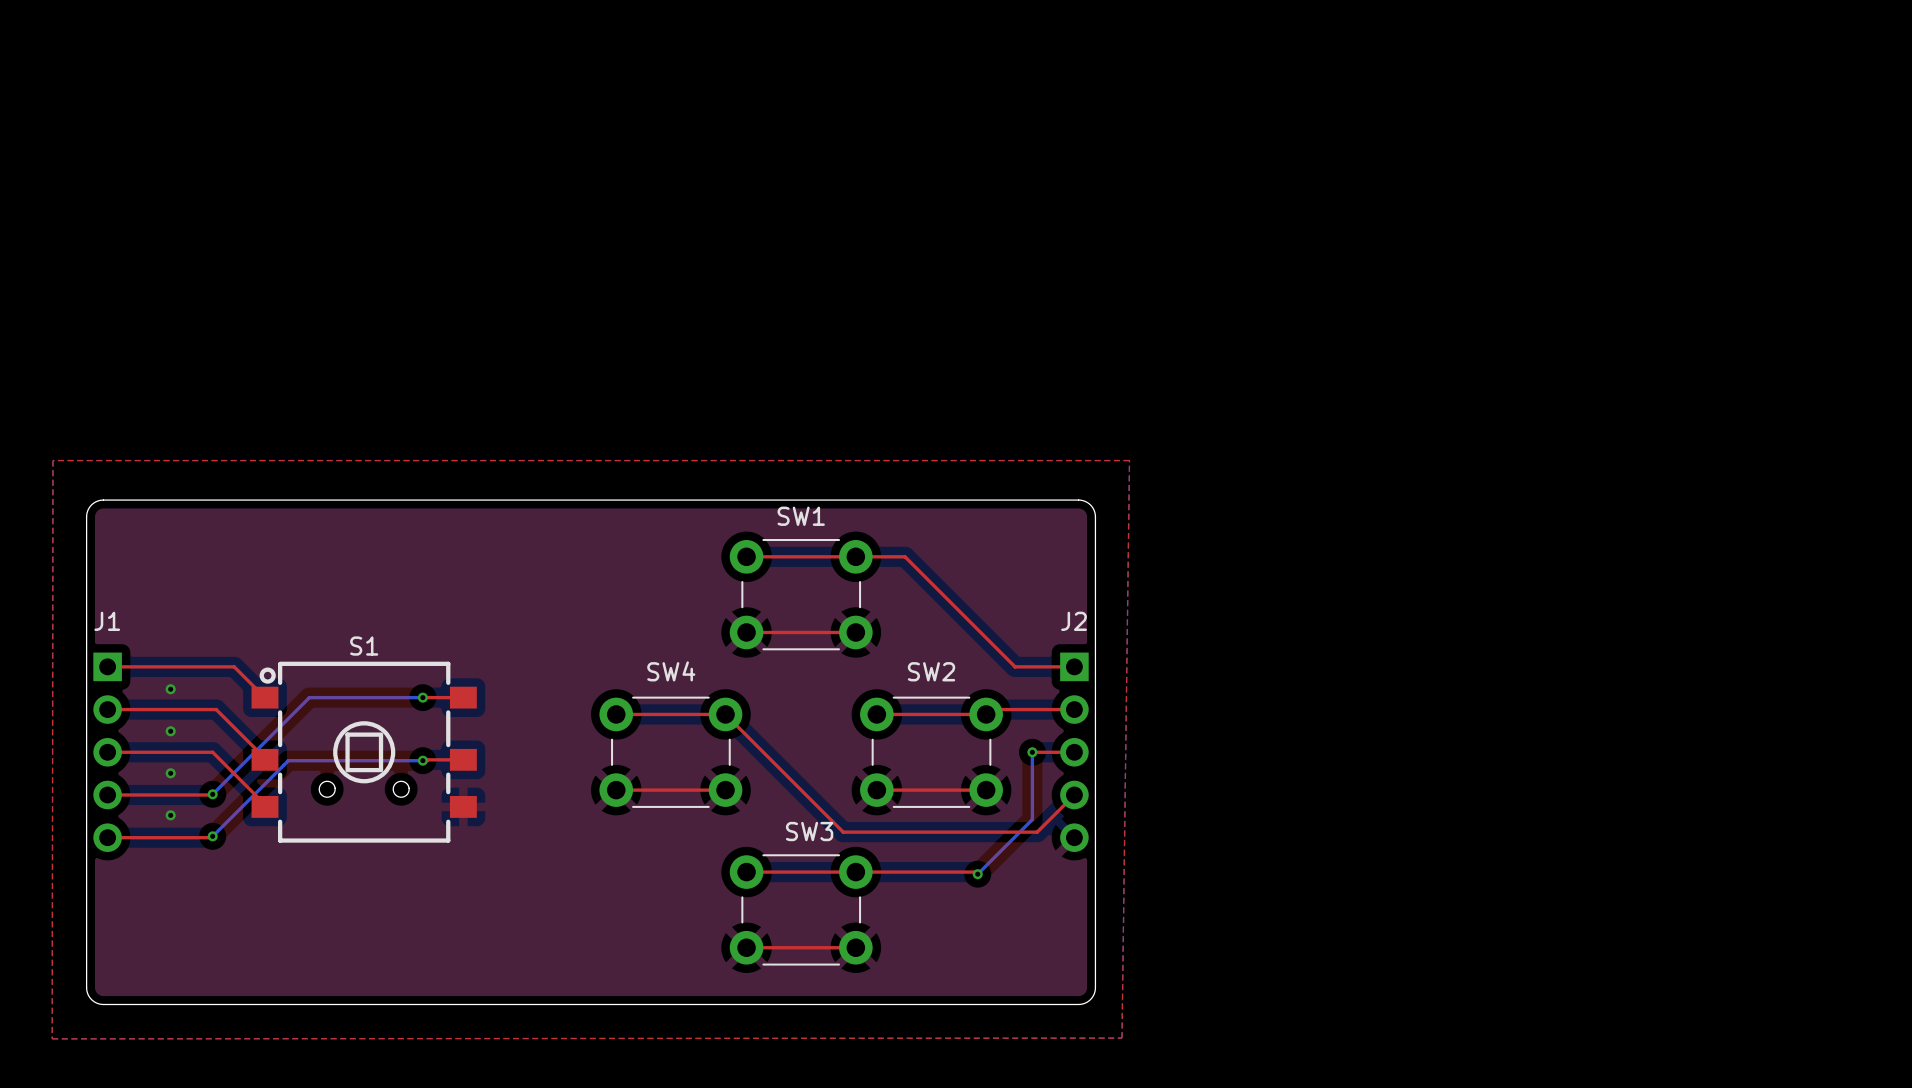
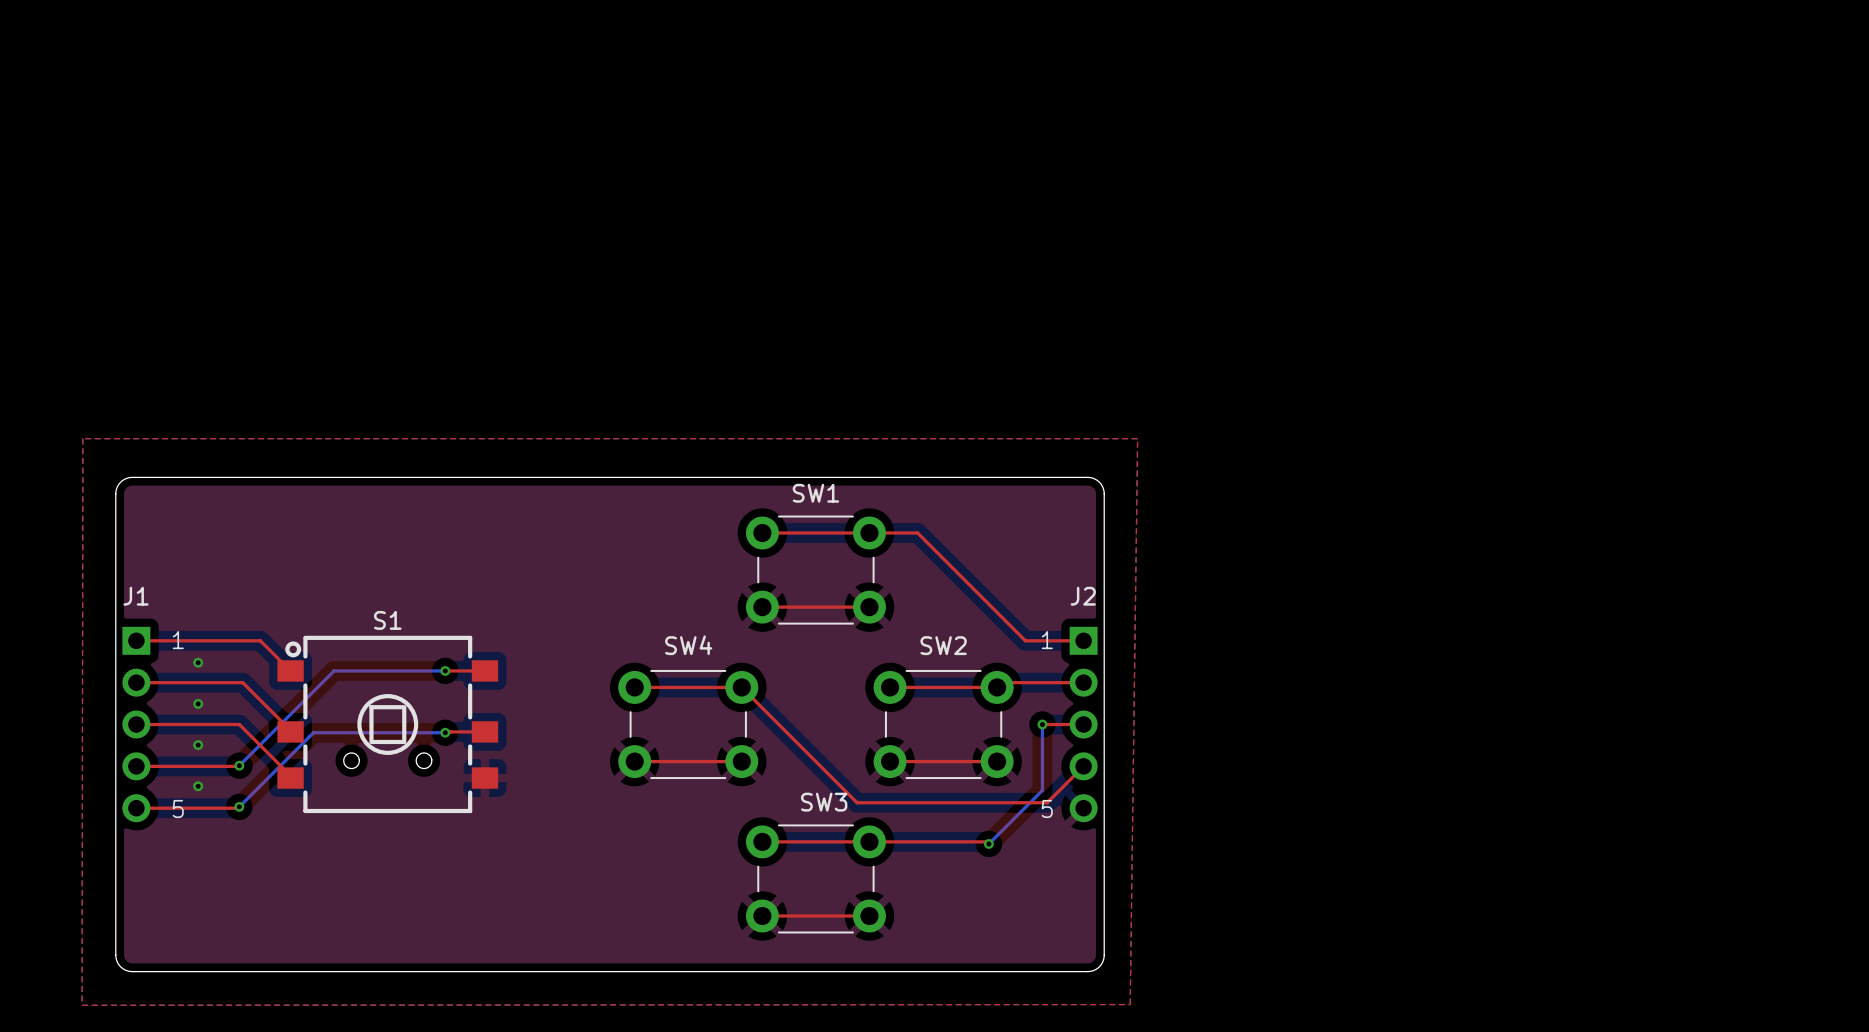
text: none -> 1 (178, 640)
text: none -> 1 (1047, 640)
text: none -> 5 (178, 808)
text: none -> 5 (1047, 808)

